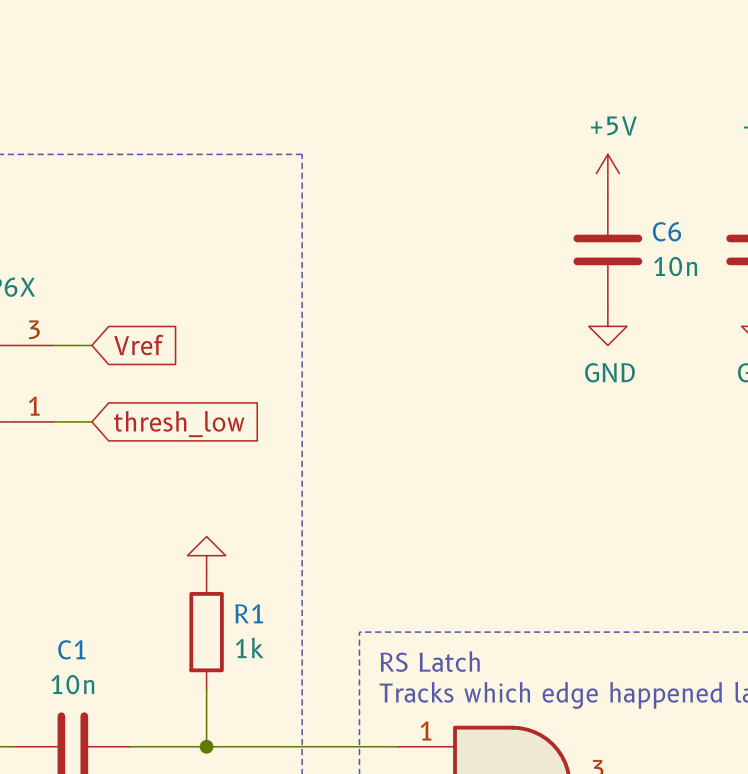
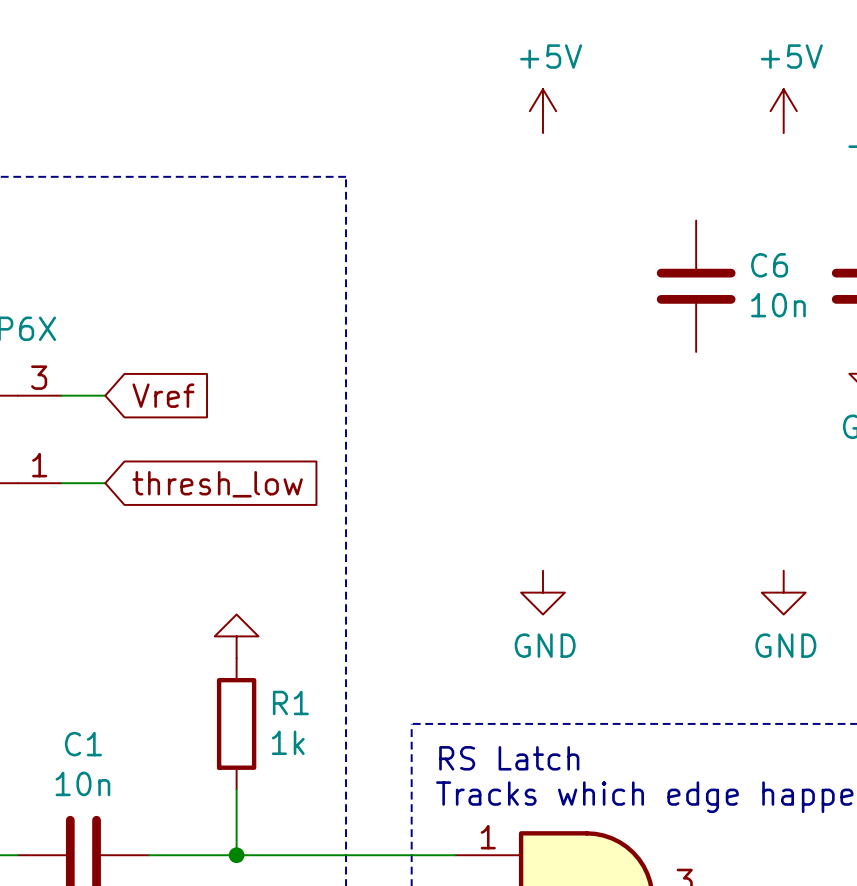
power symbol: none -> +5V (542, 111)
power symbol: none -> +5V (783, 111)
power symbol: +5V (607, 173) -> none
power symbol: GND (607, 326) -> none
power symbol: none -> GND (542, 592)
power symbol: none -> GND (783, 592)

